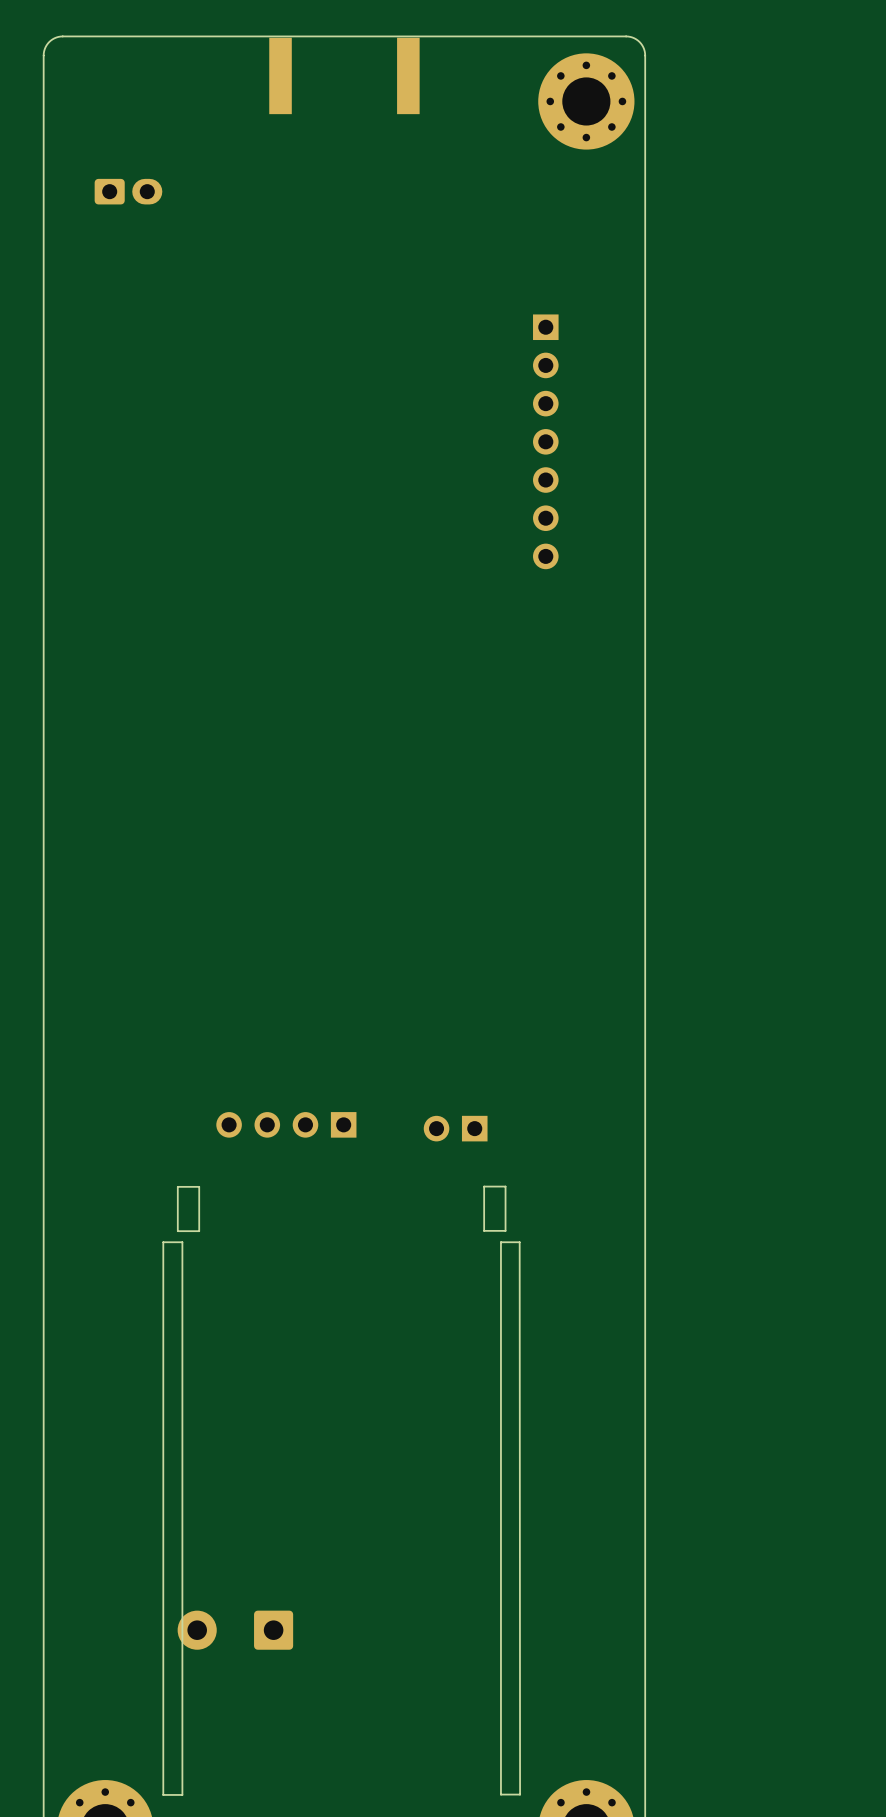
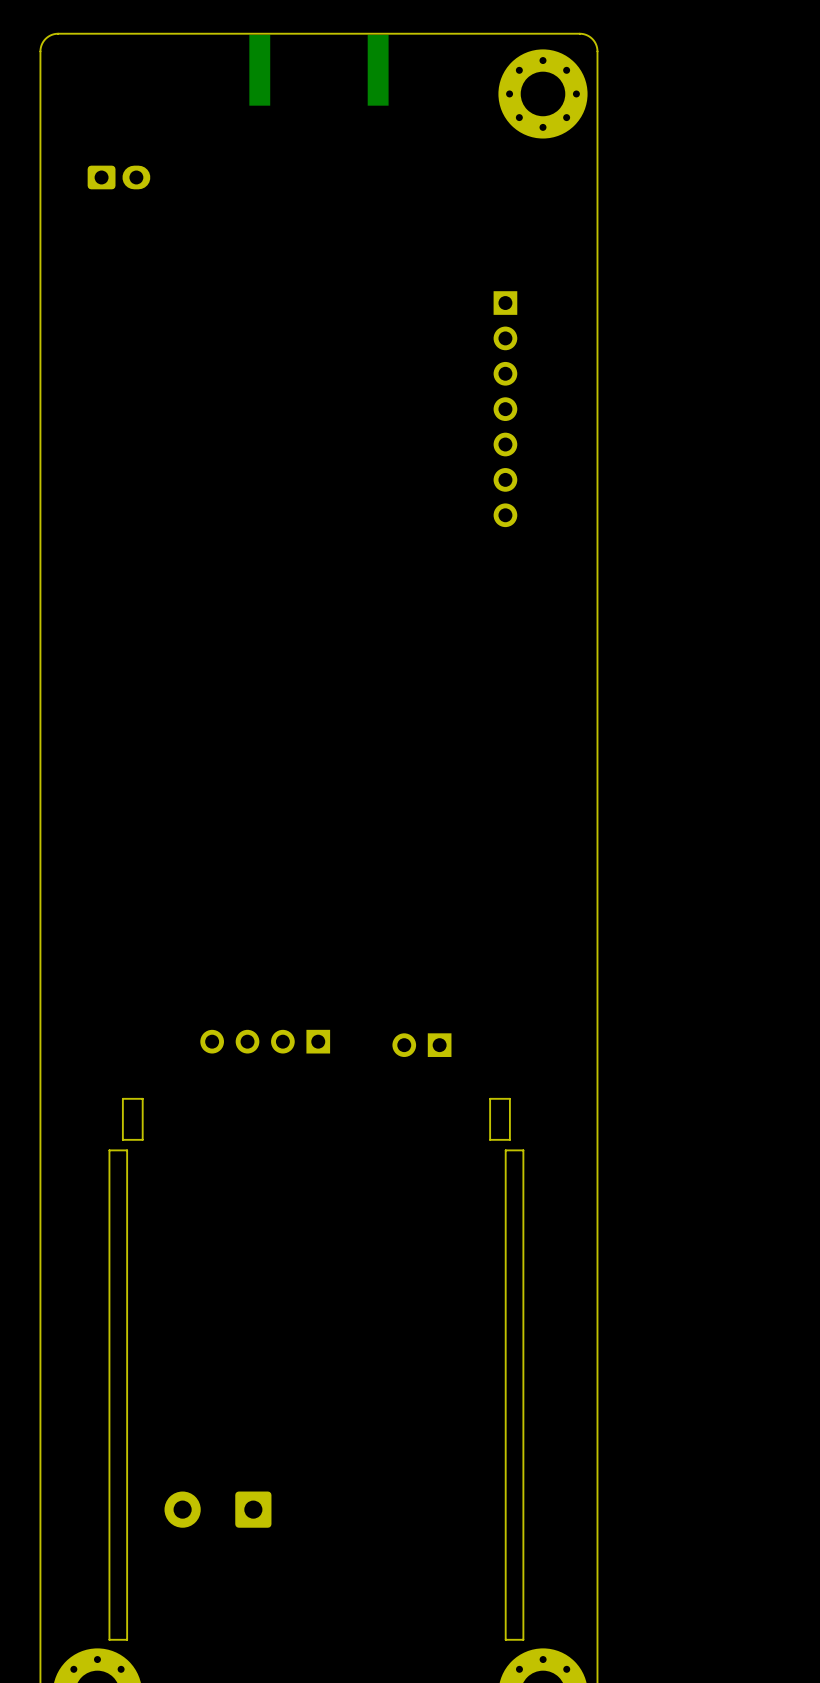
board edge: (199, 1186) (199, 1231) (177, 1231) (177, 1186) (199, 1186) -> (142, 1098) (142, 1139) (122, 1139) (122, 1098) (142, 1098)
board edge: (505, 1186) (505, 1230) (484, 1230) (484, 1186) (505, 1186) -> (509, 1098) (509, 1139) (490, 1139) (490, 1098) (509, 1098)
board edge: none -> (127, 1150) (109, 1150) (109, 1639) (127, 1639) (127, 1150)
board edge: (182, 1242) (163, 1242) (163, 1794) (182, 1794) (182, 1242) -> none
board edge: (519, 1242) (520, 1794) (500, 1794) (500, 1242) (519, 1242) -> none
board edge: none -> (523, 1150) (523, 1639) (505, 1639) (505, 1150) (523, 1150)

